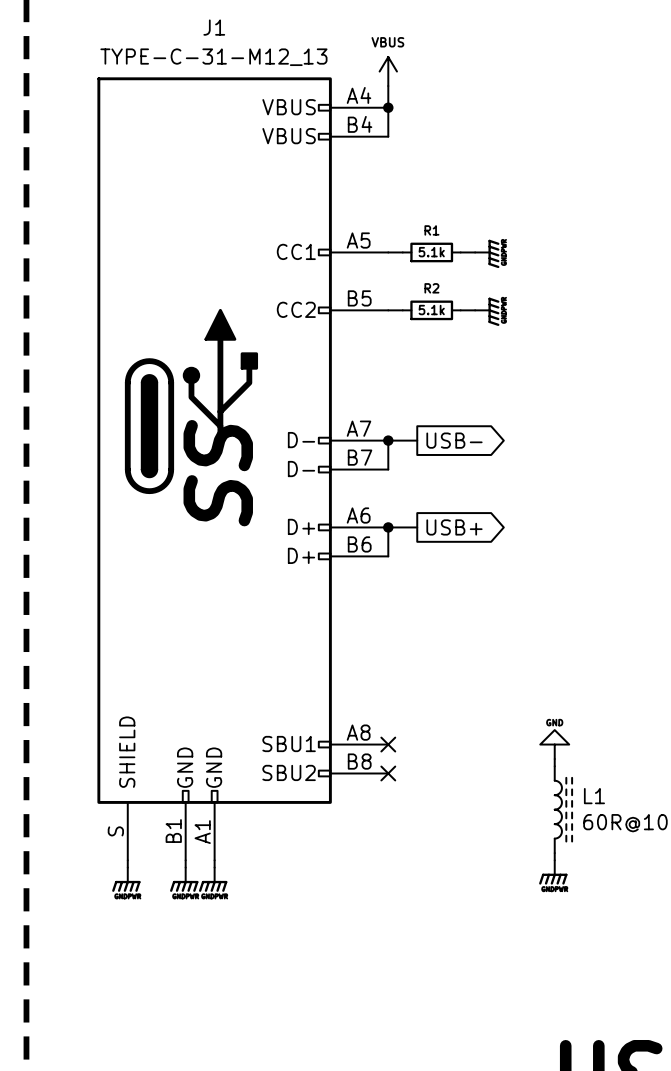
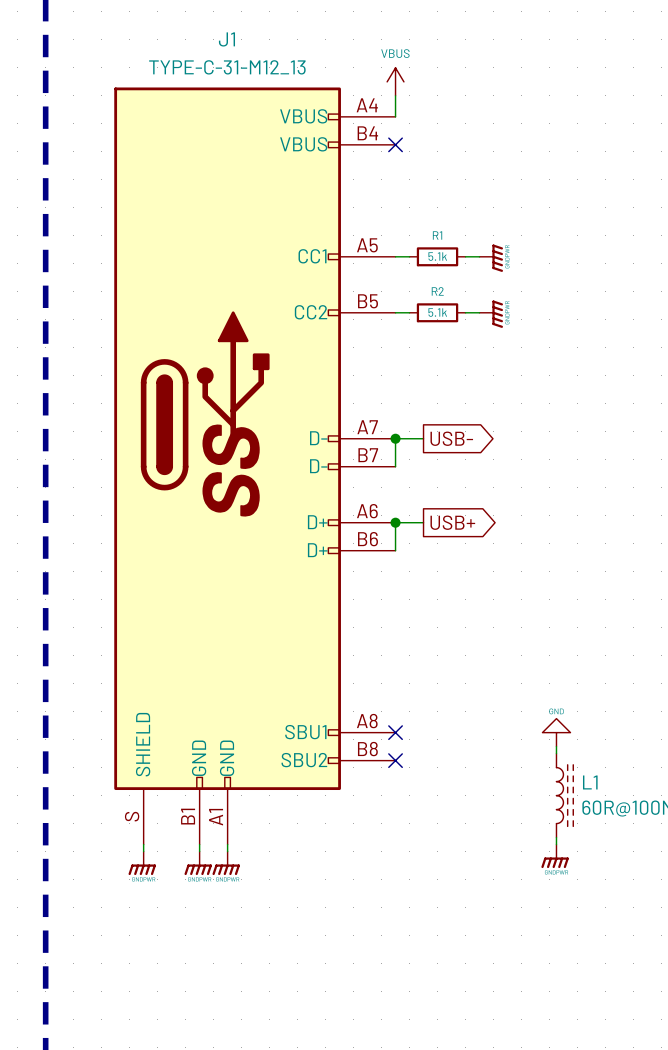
wire: (388, 107) (388, 136) -> none
junction: (388, 107) -> none
no-connect mark: none -> (395, 144)

